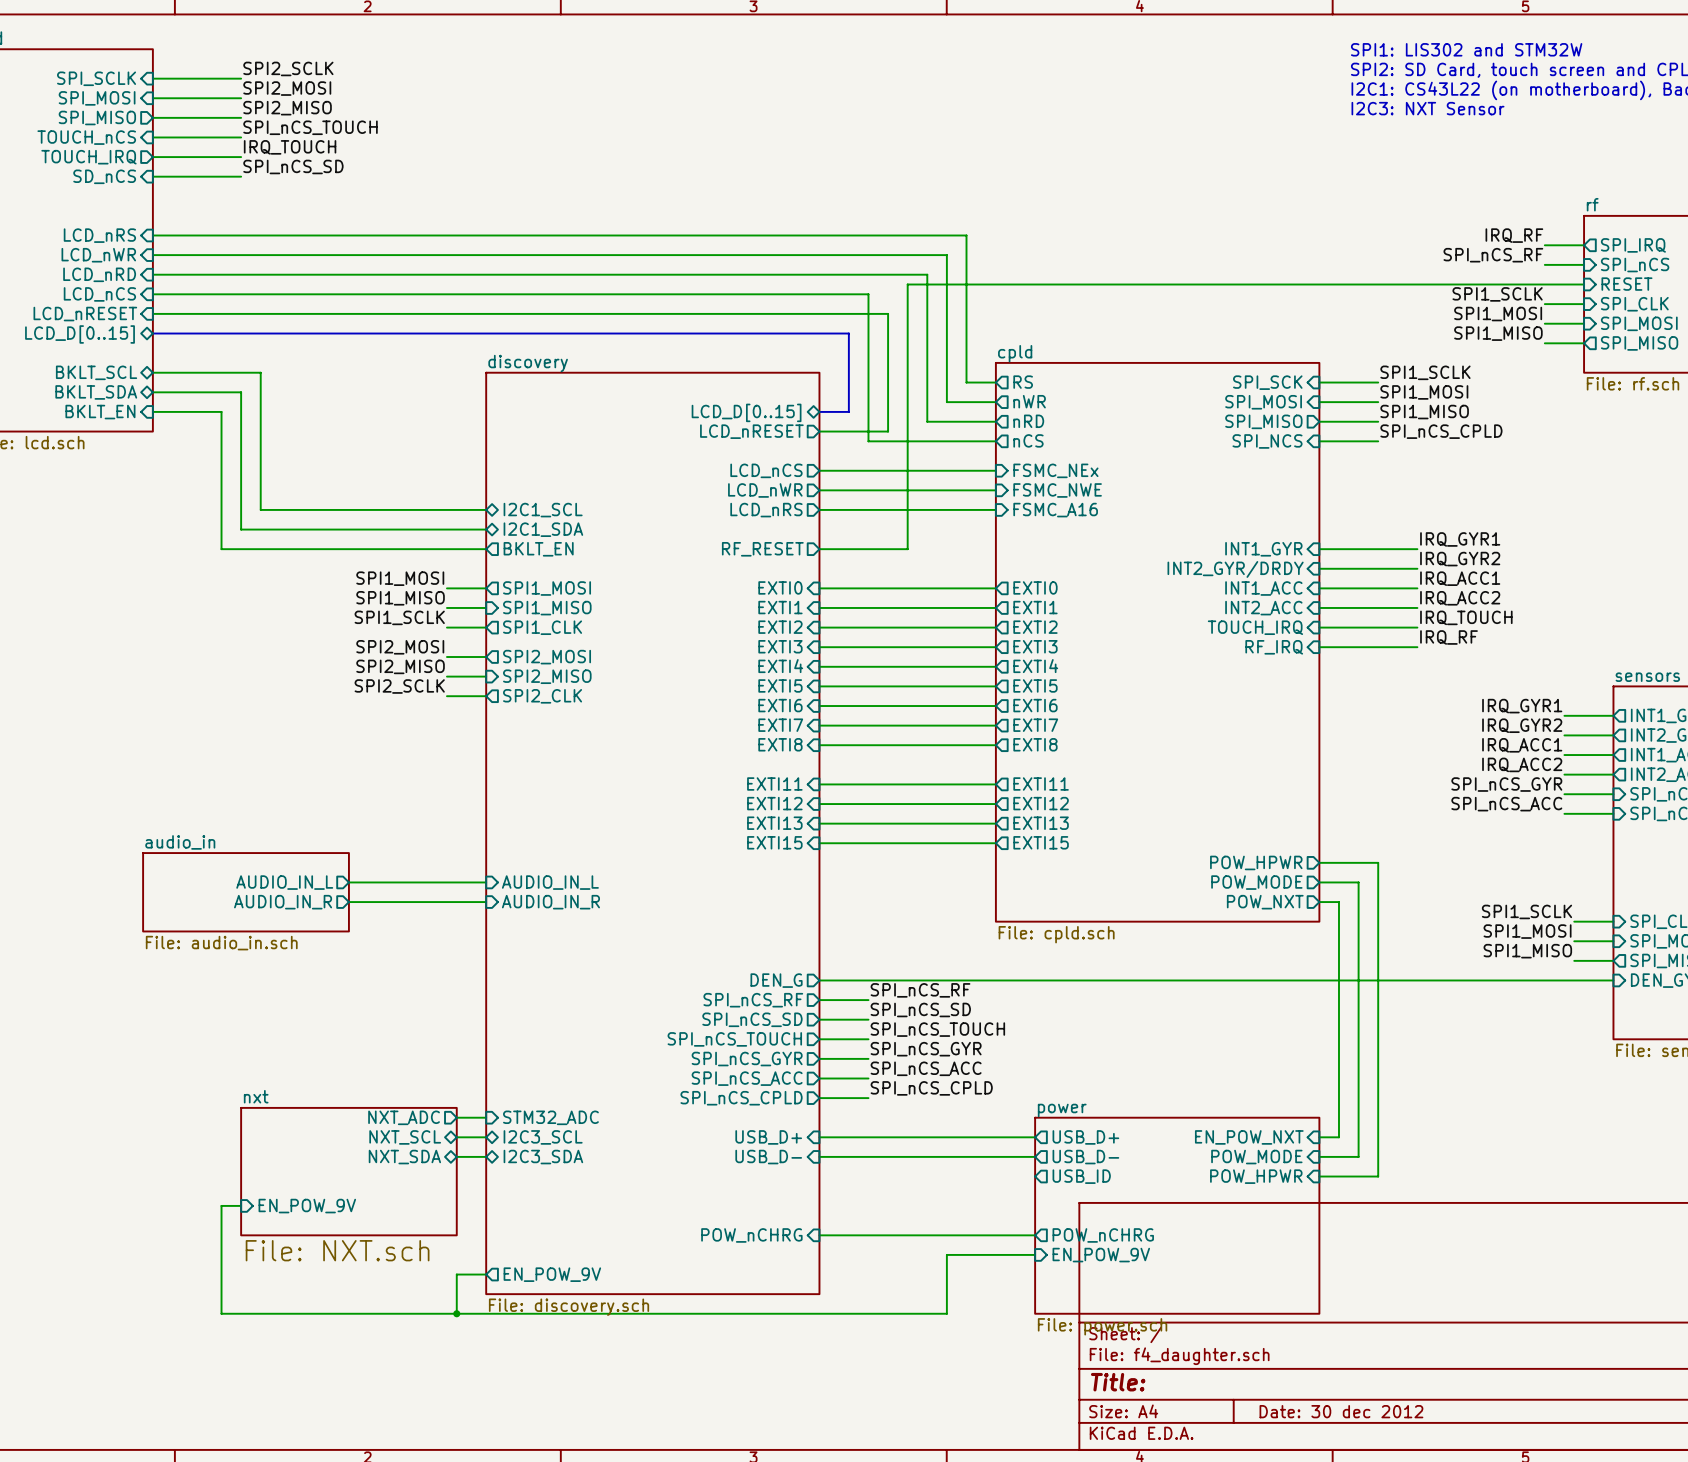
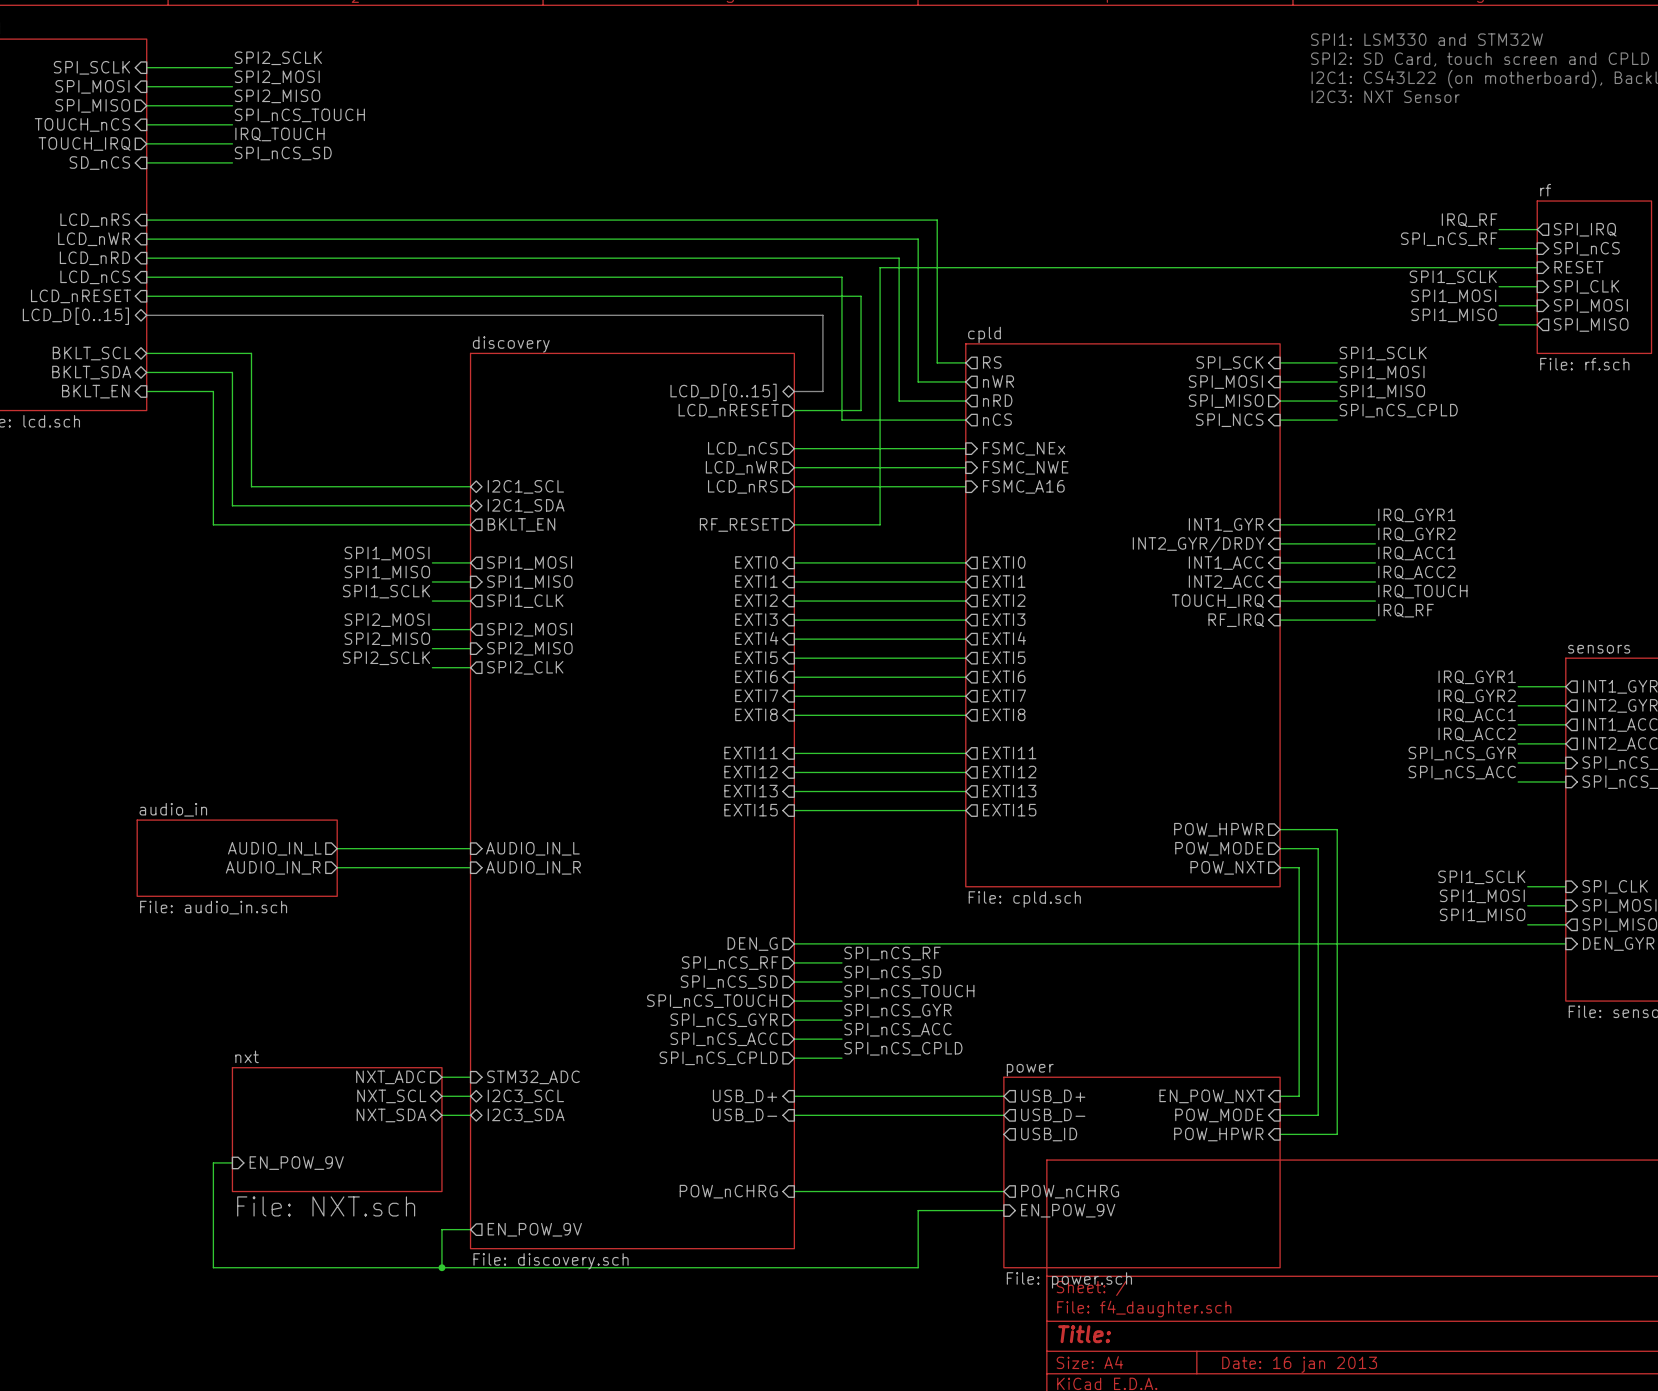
text: SPI1: LIS302 and STM32W (1466, 49) -> SPI1: LSM330 and STM32W (1426, 39)
title block: Date: 30 dec 2012 (1341, 1411) -> Date: 16 jan 2013 (1299, 1364)

